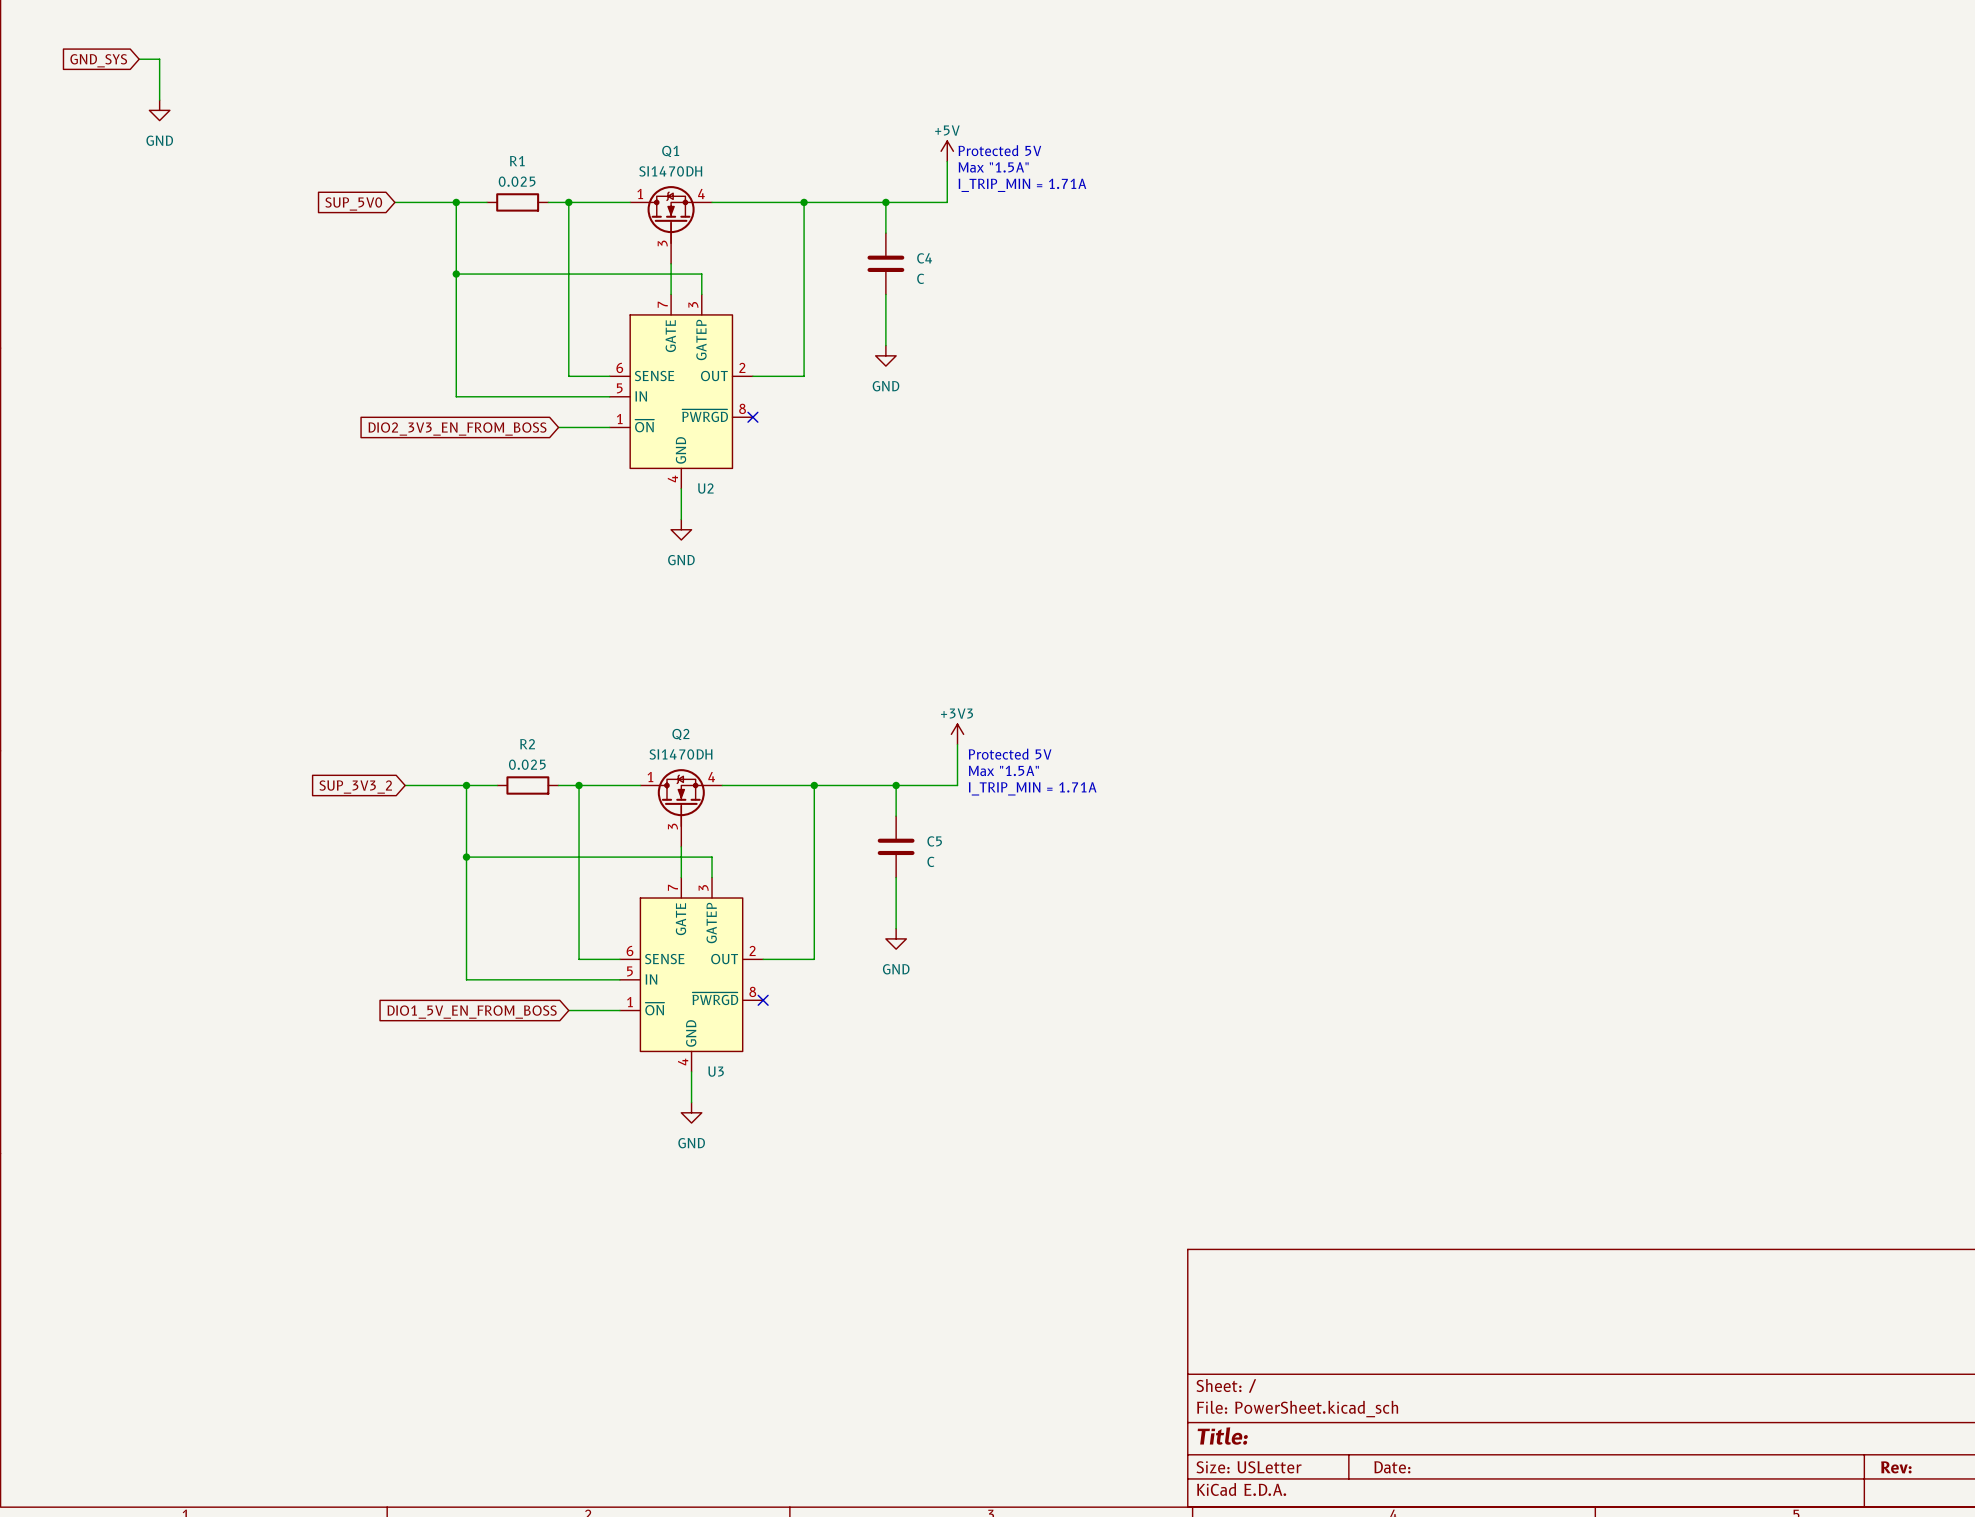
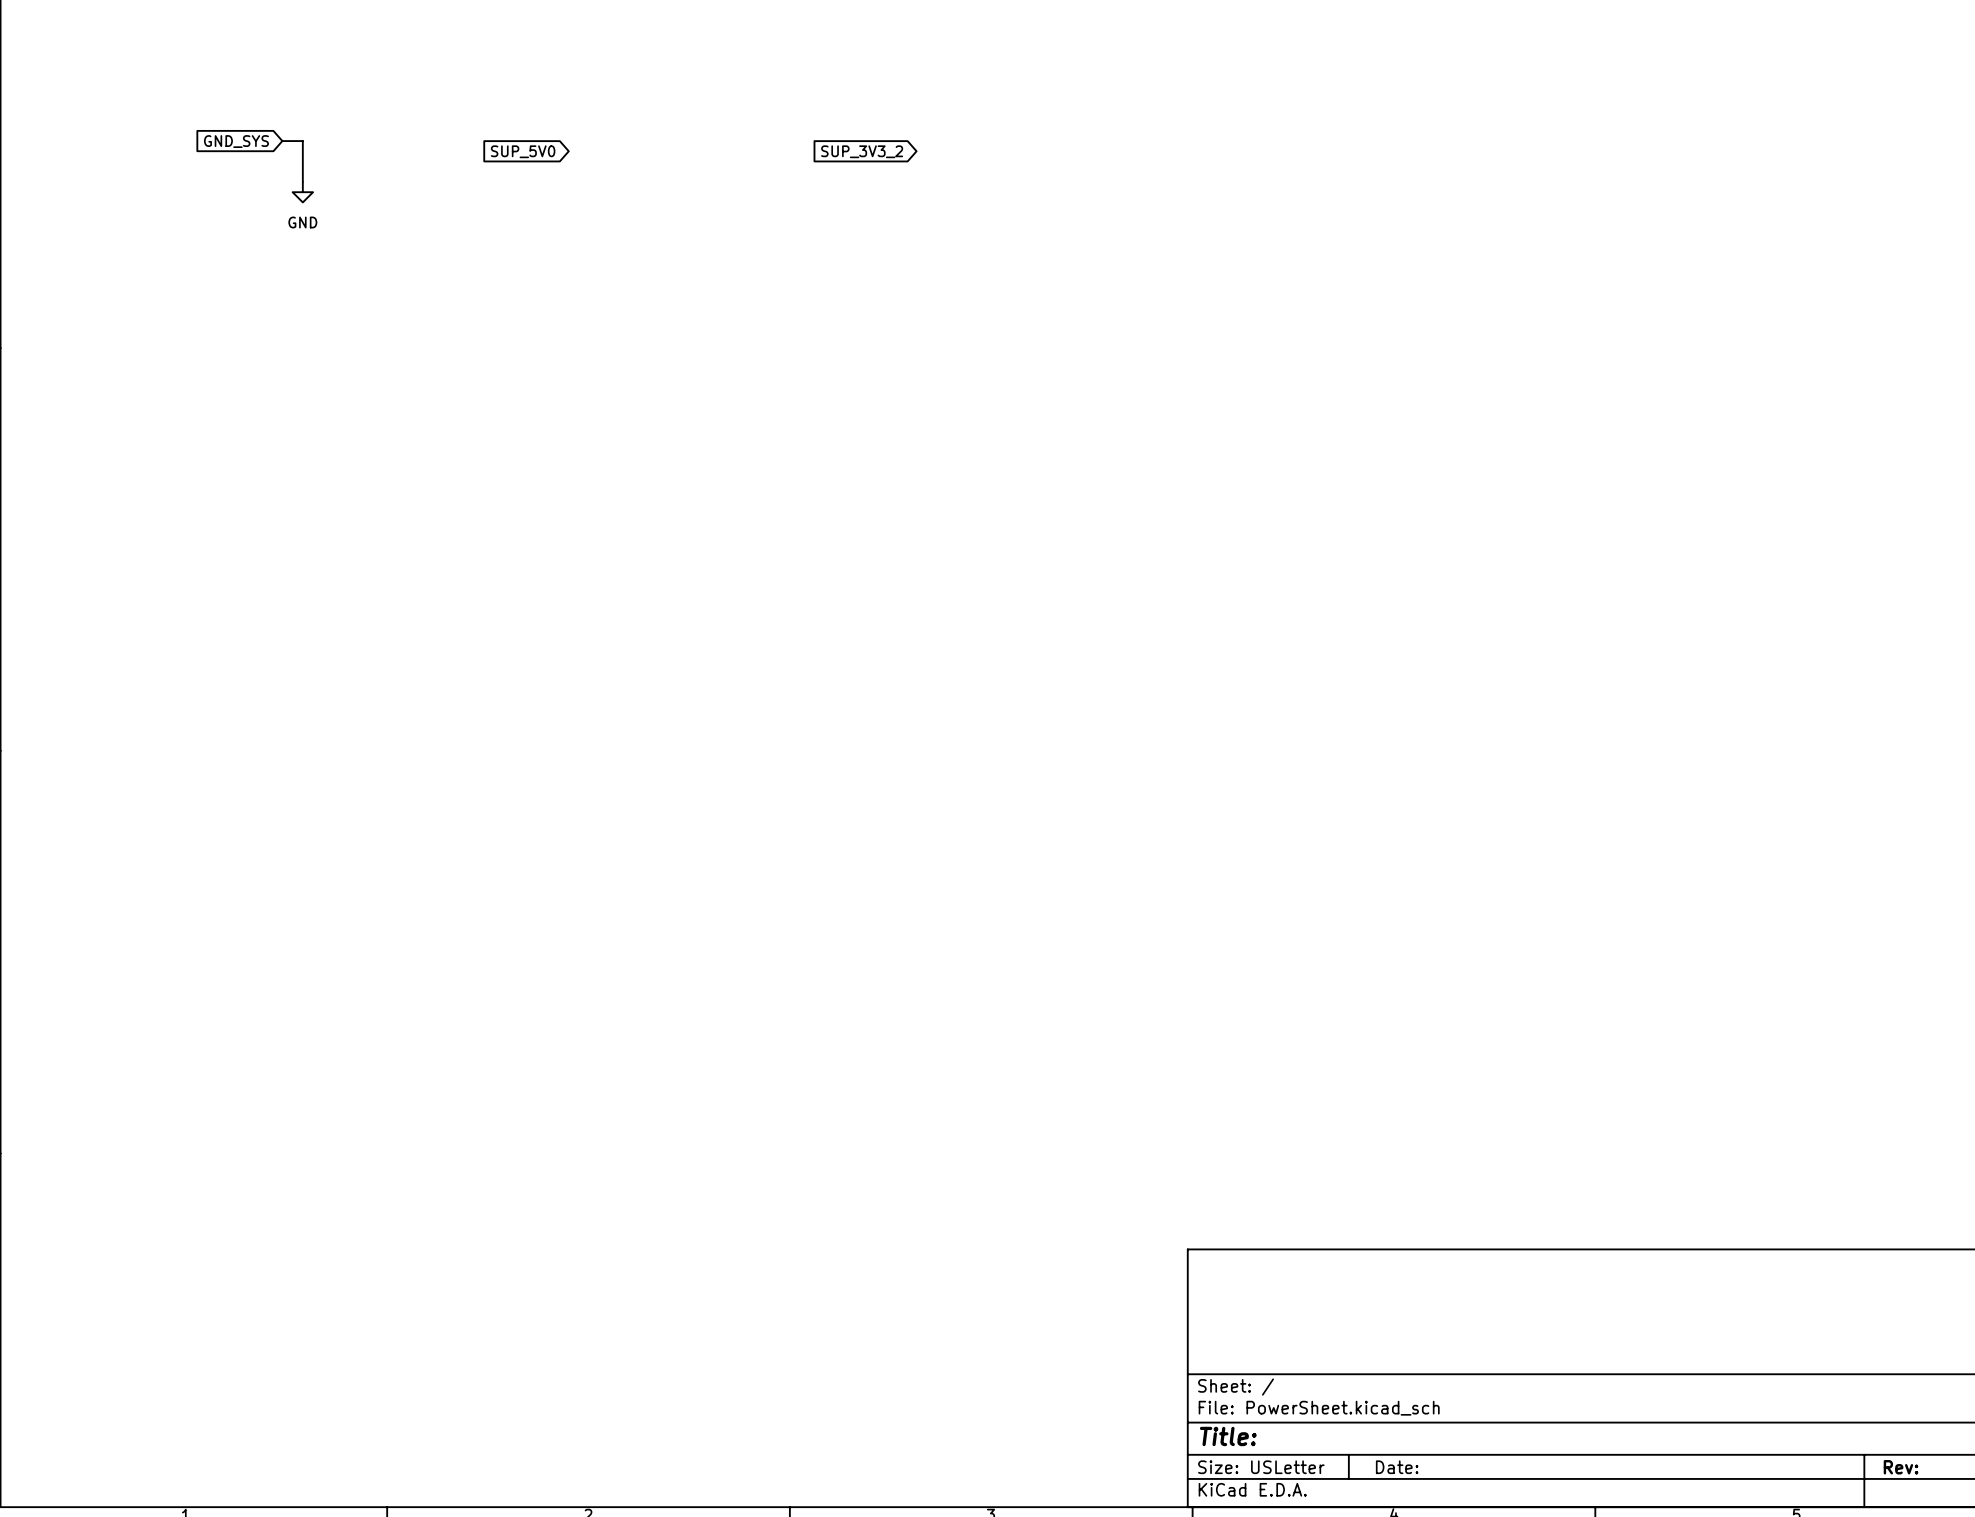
wire: (139, 59) (159, 59) (159, 100) -> (282, 141) (302, 141) (302, 181)
global label position: GND_SYS (98, 60) -> GND_SYS (236, 141)
power symbol position: GND (159, 110) -> GND (302, 192)
text: Protected 5V (999, 150) -> none
power symbol: +5V (947, 151) -> none
global label: none -> SUP_3V3_2 (862, 151)
wire: (947, 161) (947, 202) (712, 202) -> none
text: Max "1.5A" (993, 167) -> none
text: I_TRIP_MIN = 1.71A (1022, 185) -> none
wire: (394, 202) (486, 202) -> none
wire: (456, 202) (456, 396) (609, 396) -> none
junction: (456, 202) -> none
R1: 0.025 (517, 202) -> none
wire: (548, 202) (630, 202) -> none
wire: (568, 202) (568, 376) (609, 376) -> none
junction: (568, 202) -> none
wire: (804, 202) (804, 376) (752, 376) -> none
junction: (804, 202) -> none
wire: (885, 202) (885, 233) -> none
junction: (885, 202) -> none
global label position: SUP_5V0 (353, 203) -> SUP_5V0 (523, 151)
Q1: SI1470DH (671, 224) -> none
wire: (671, 263) (671, 294) -> none
C4: C (885, 263) -> none
wire: (456, 274) (701, 274) (701, 294) -> none
junction: (456, 274) -> none
wire: (885, 294) (885, 345) -> none
power symbol: GND (885, 355) -> none
U2: (681, 391) -> none
no-connect mark: (752, 417) -> none
wire: (558, 427) (609, 427) -> none
global label: DIO2_3V3_EN_FROM_BOSS (457, 429) -> none
wire: (681, 488) (681, 519) -> none
power symbol: GND (681, 529) -> none
power symbol: +3V3 (957, 734) -> none
wire: (957, 744) (957, 785) (722, 785) -> none
text: Protected 5V (1010, 754) -> none
text: Max "1.5A" (1003, 770) -> none
wire: (405, 785) (497, 785) -> none
wire: (466, 785) (466, 979) (619, 979) -> none
junction: (466, 785) -> none
R2: 0.025 (527, 785) -> none
wire: (558, 785) (640, 785) -> none
wire: (579, 785) (579, 959) (619, 959) -> none
junction: (579, 785) -> none
wire: (814, 785) (814, 959) (763, 959) -> none
junction: (814, 785) -> none
wire: (896, 785) (896, 816) -> none
junction: (896, 785) -> none
global label: SUP_3V3_2 (355, 787) -> none
text: I_TRIP_MIN = 1.71A (1032, 788) -> none
Q2: SI1470DH (681, 807) -> none
wire: (681, 846) (681, 877) -> none
C5: C (896, 846) -> none
wire: (466, 857) (712, 857) (712, 877) -> none
junction: (466, 857) -> none
wire: (896, 877) (896, 928) -> none
power symbol: GND (896, 938) -> none
U3: (691, 974) -> none
no-connect mark: (763, 1000) -> none
wire: (568, 1010) (619, 1010) -> none
global label: DIO1_5V_EN_FROM_BOSS (472, 1012) -> none
wire: (691, 1071) (691, 1102) -> none
power symbol: GND (691, 1112) -> none

